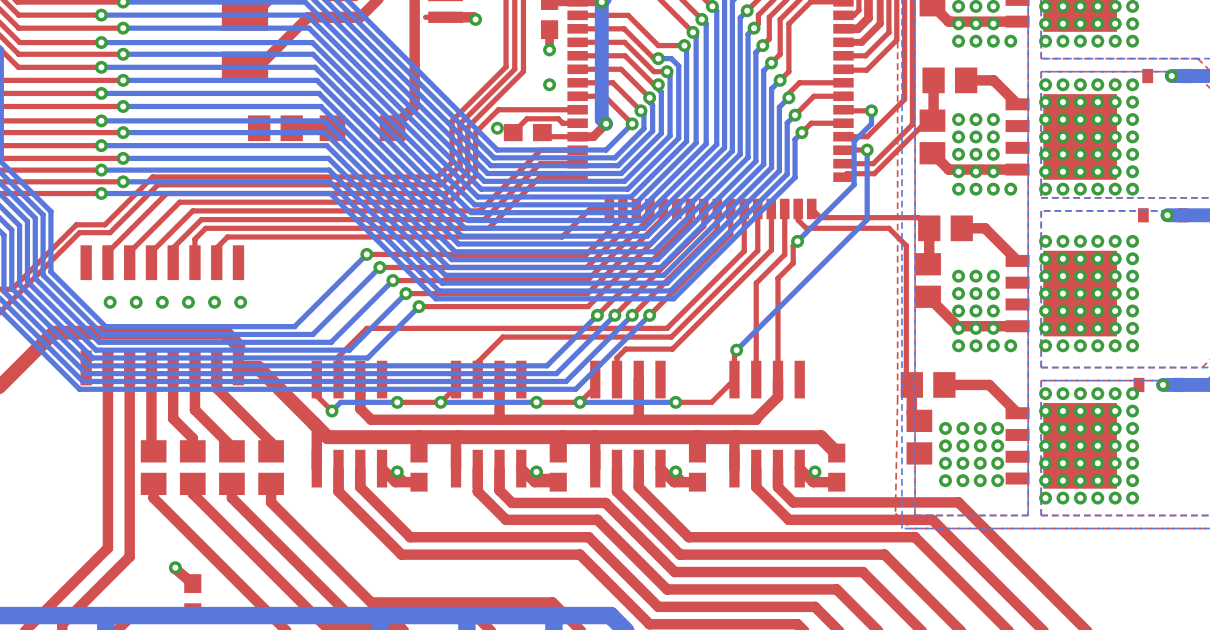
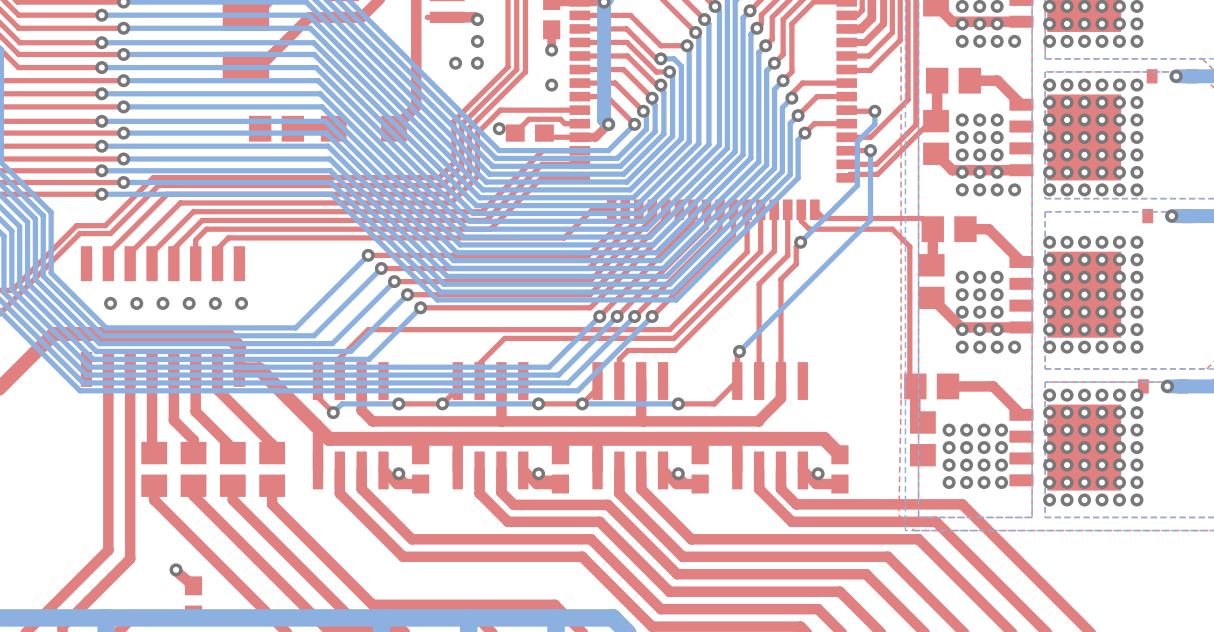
via: none -> (477, 41)
via: none -> (455, 63)
via: none -> (477, 63)

